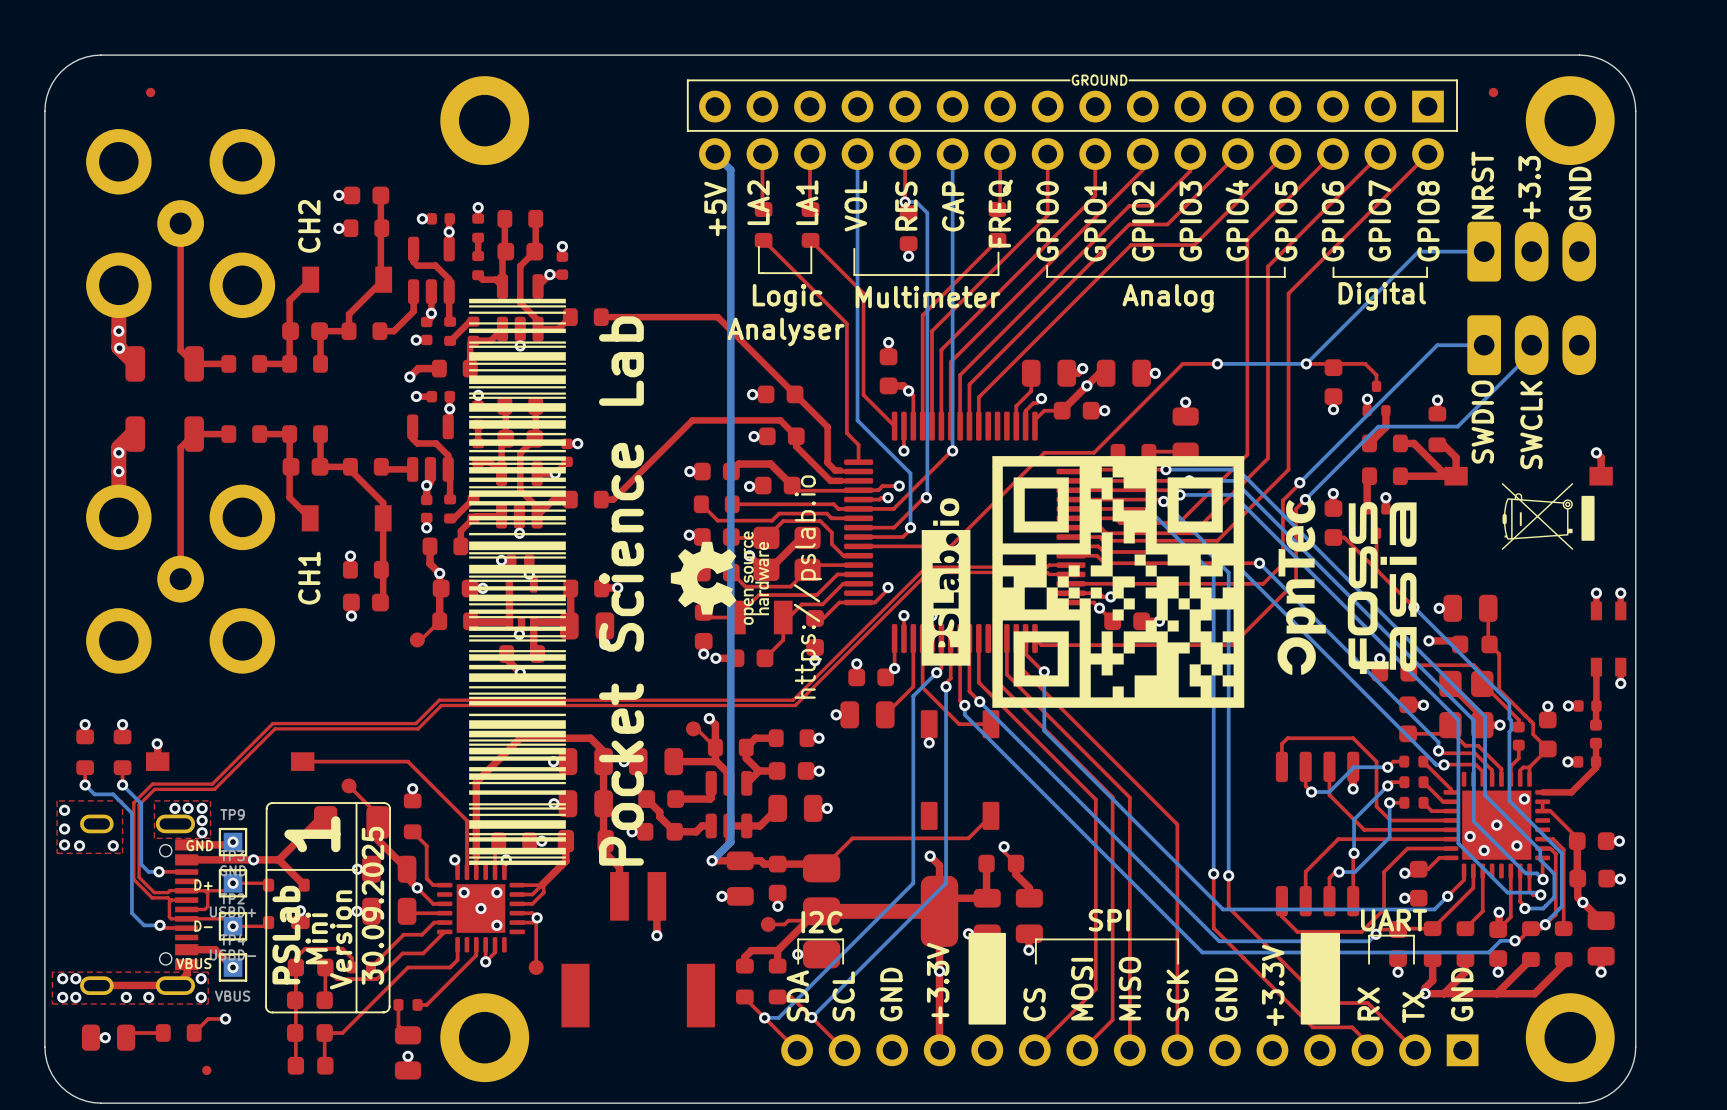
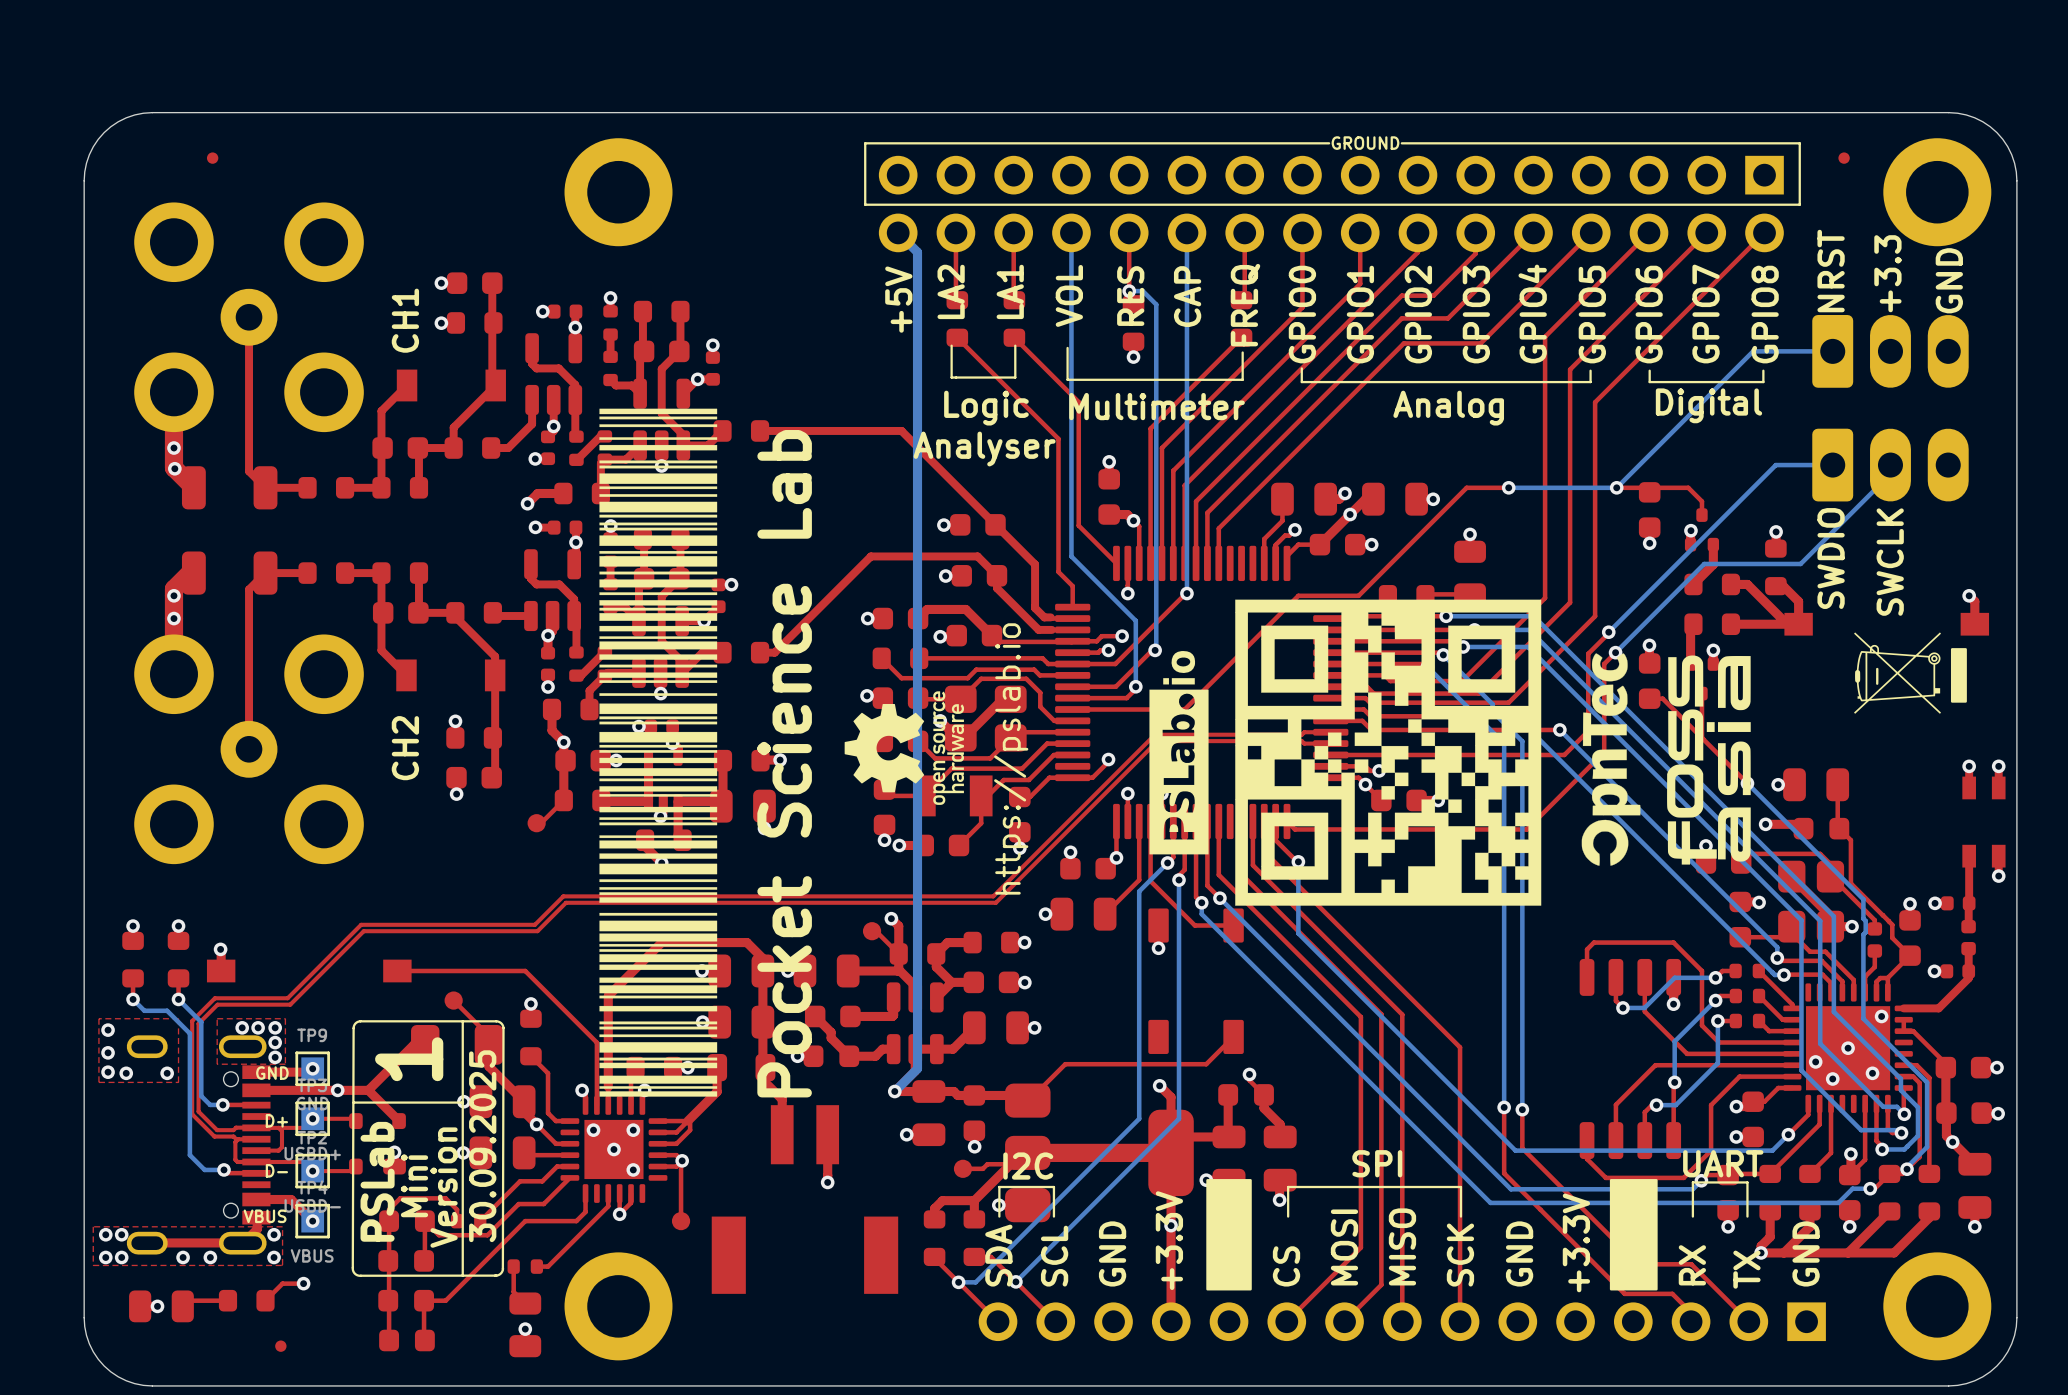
text: CH2 (309, 226) -> CH1 (405, 320)
text: CH1 (309, 578) -> CH2 (405, 748)

